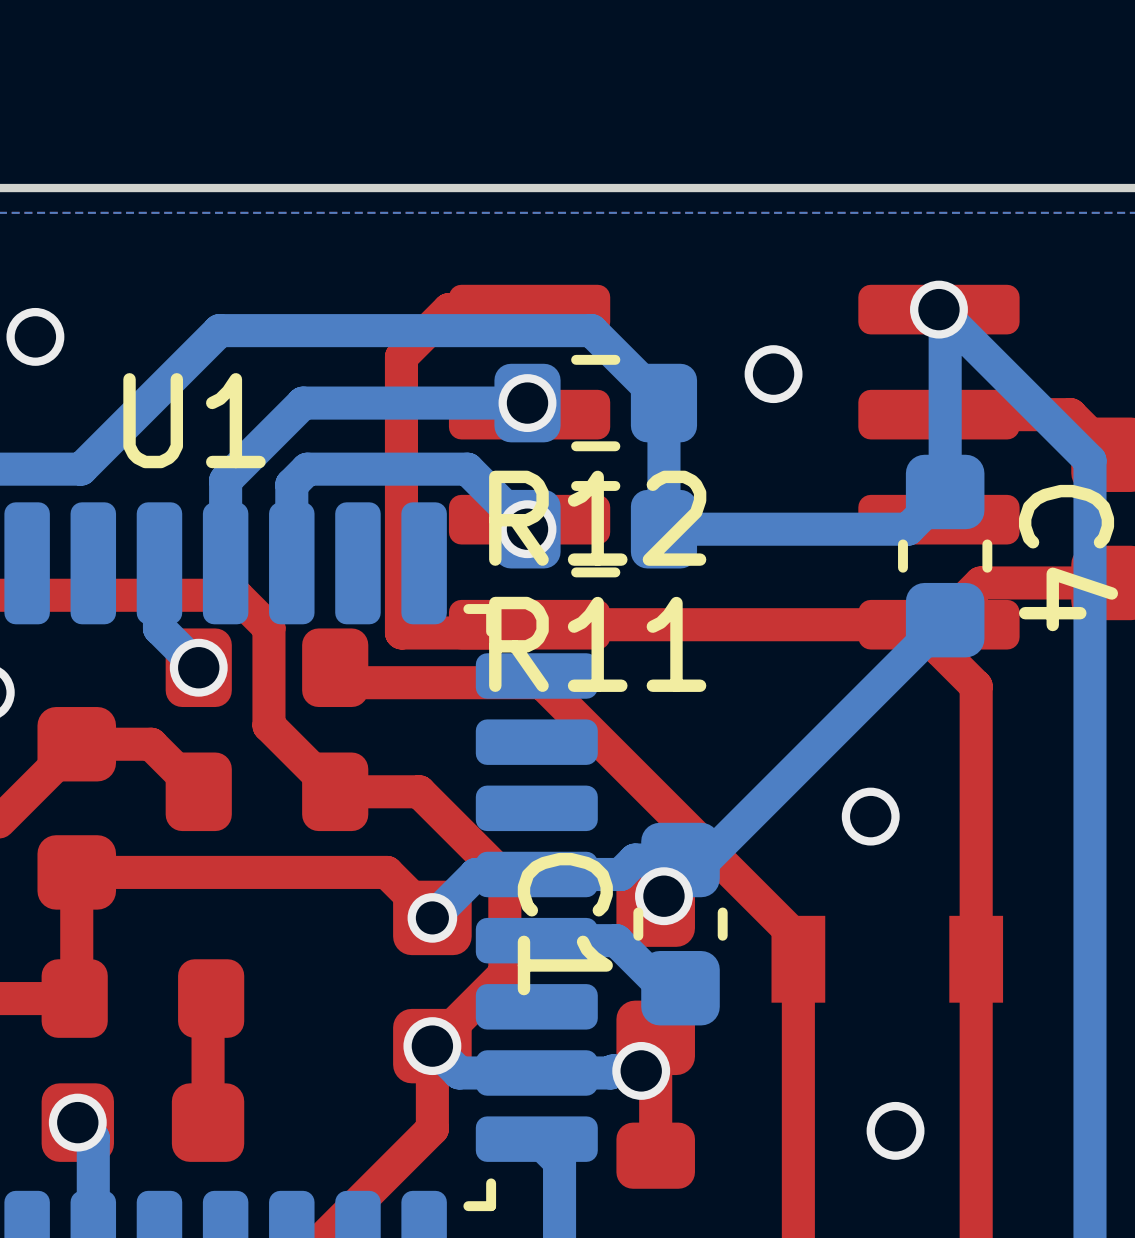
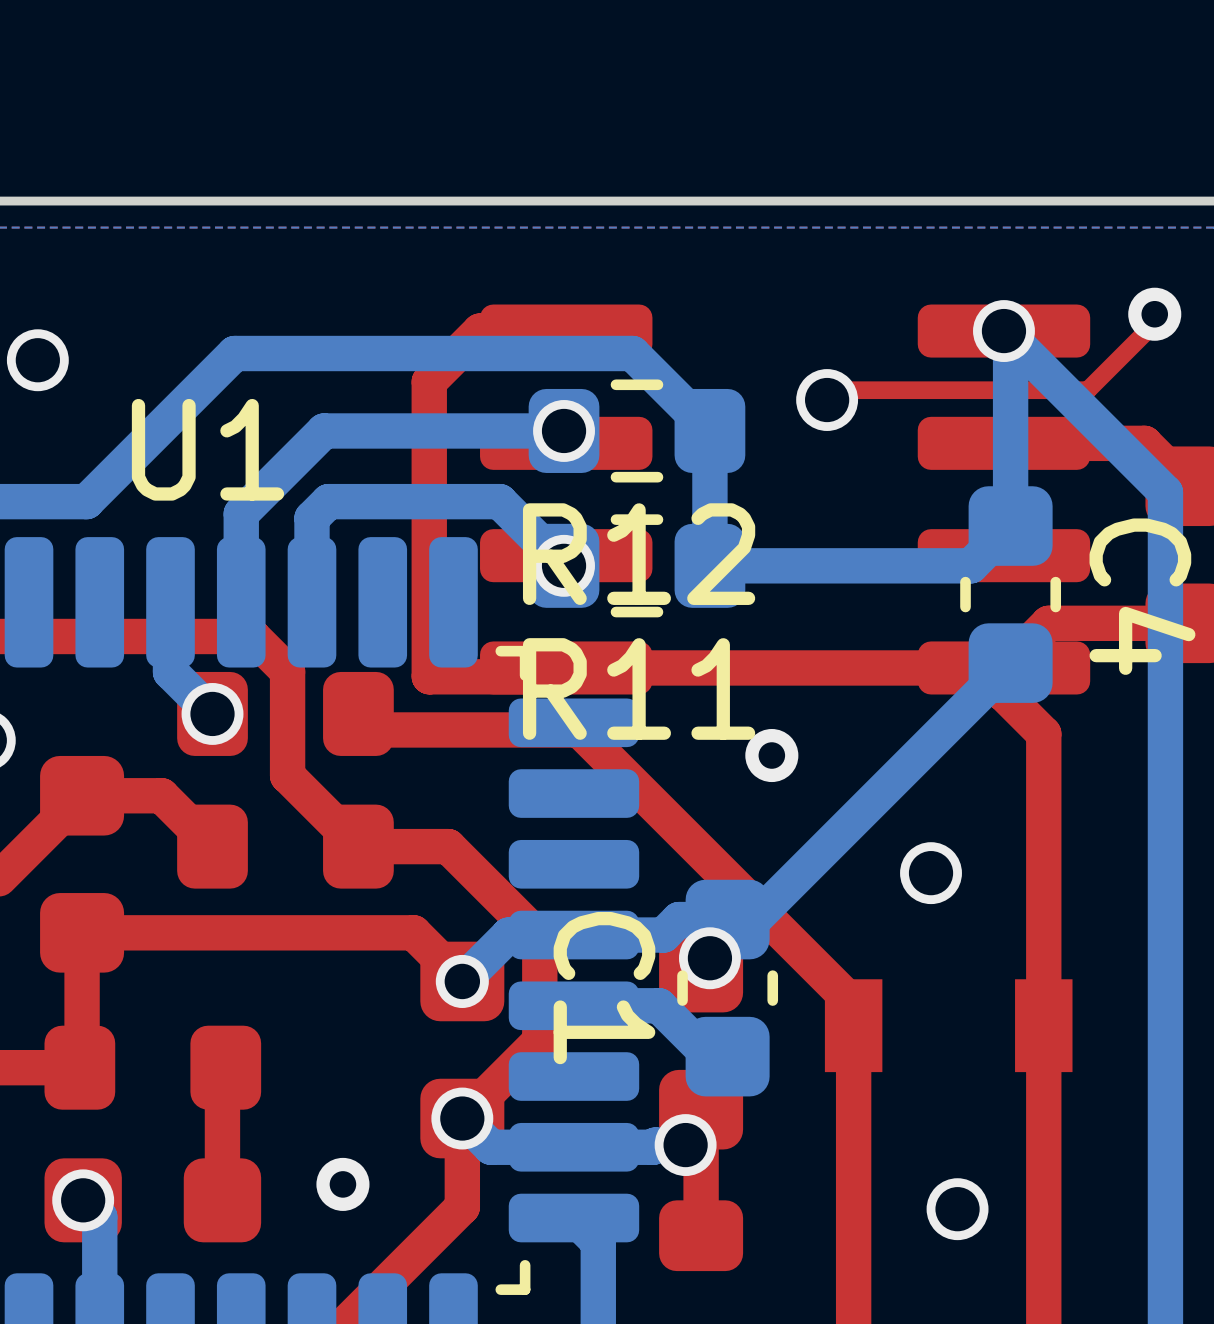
top track: none -> (1154, 314) (1154, 323) (1087, 390) (836, 390) (827, 400)
via: none -> (1154, 314)
via: none -> (771, 755)
via: none -> (342, 1184)

